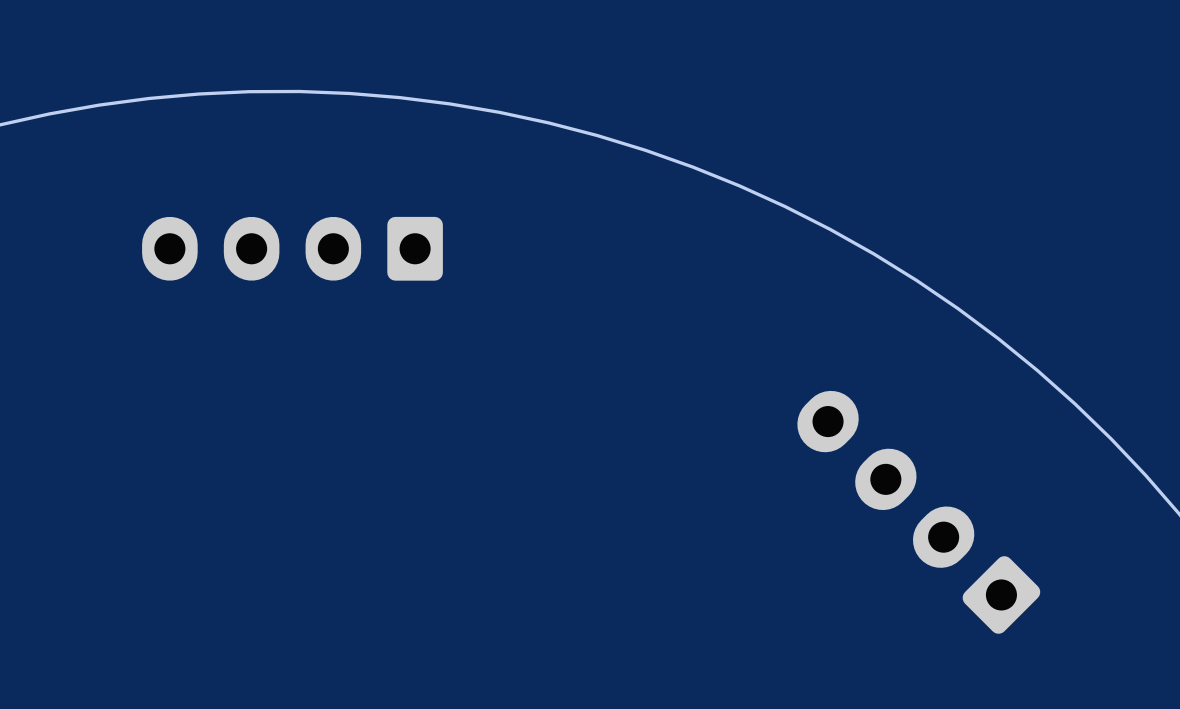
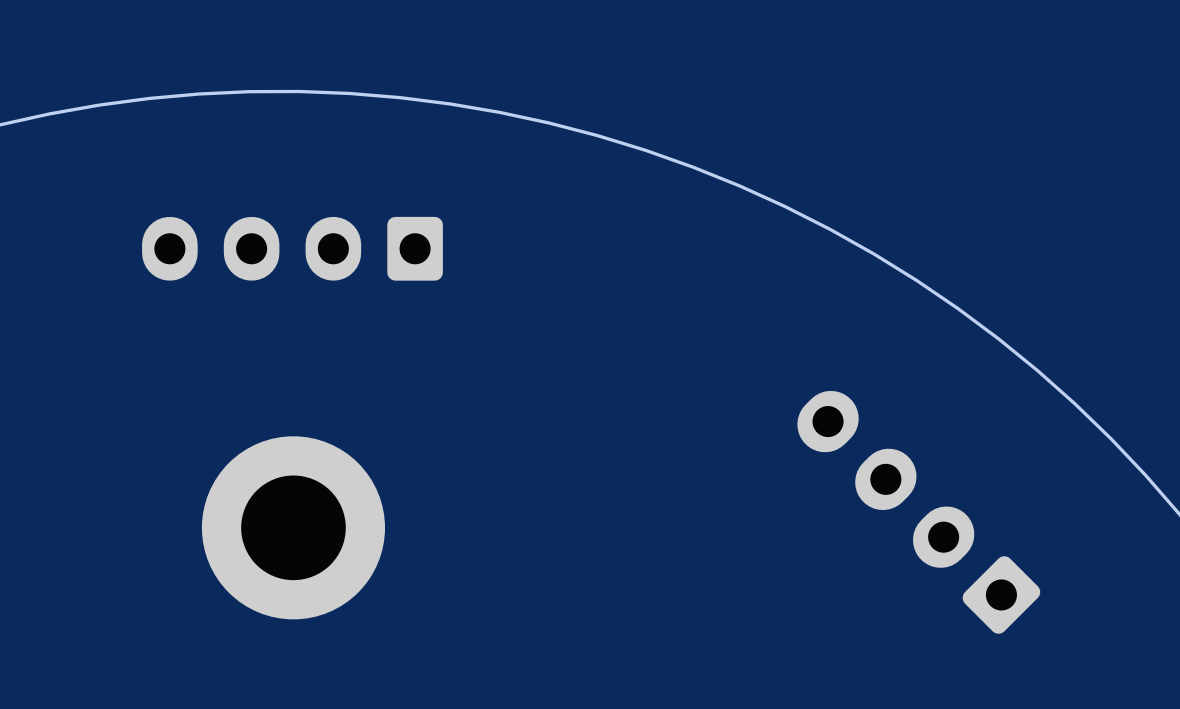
part: none -> (293, 527)

